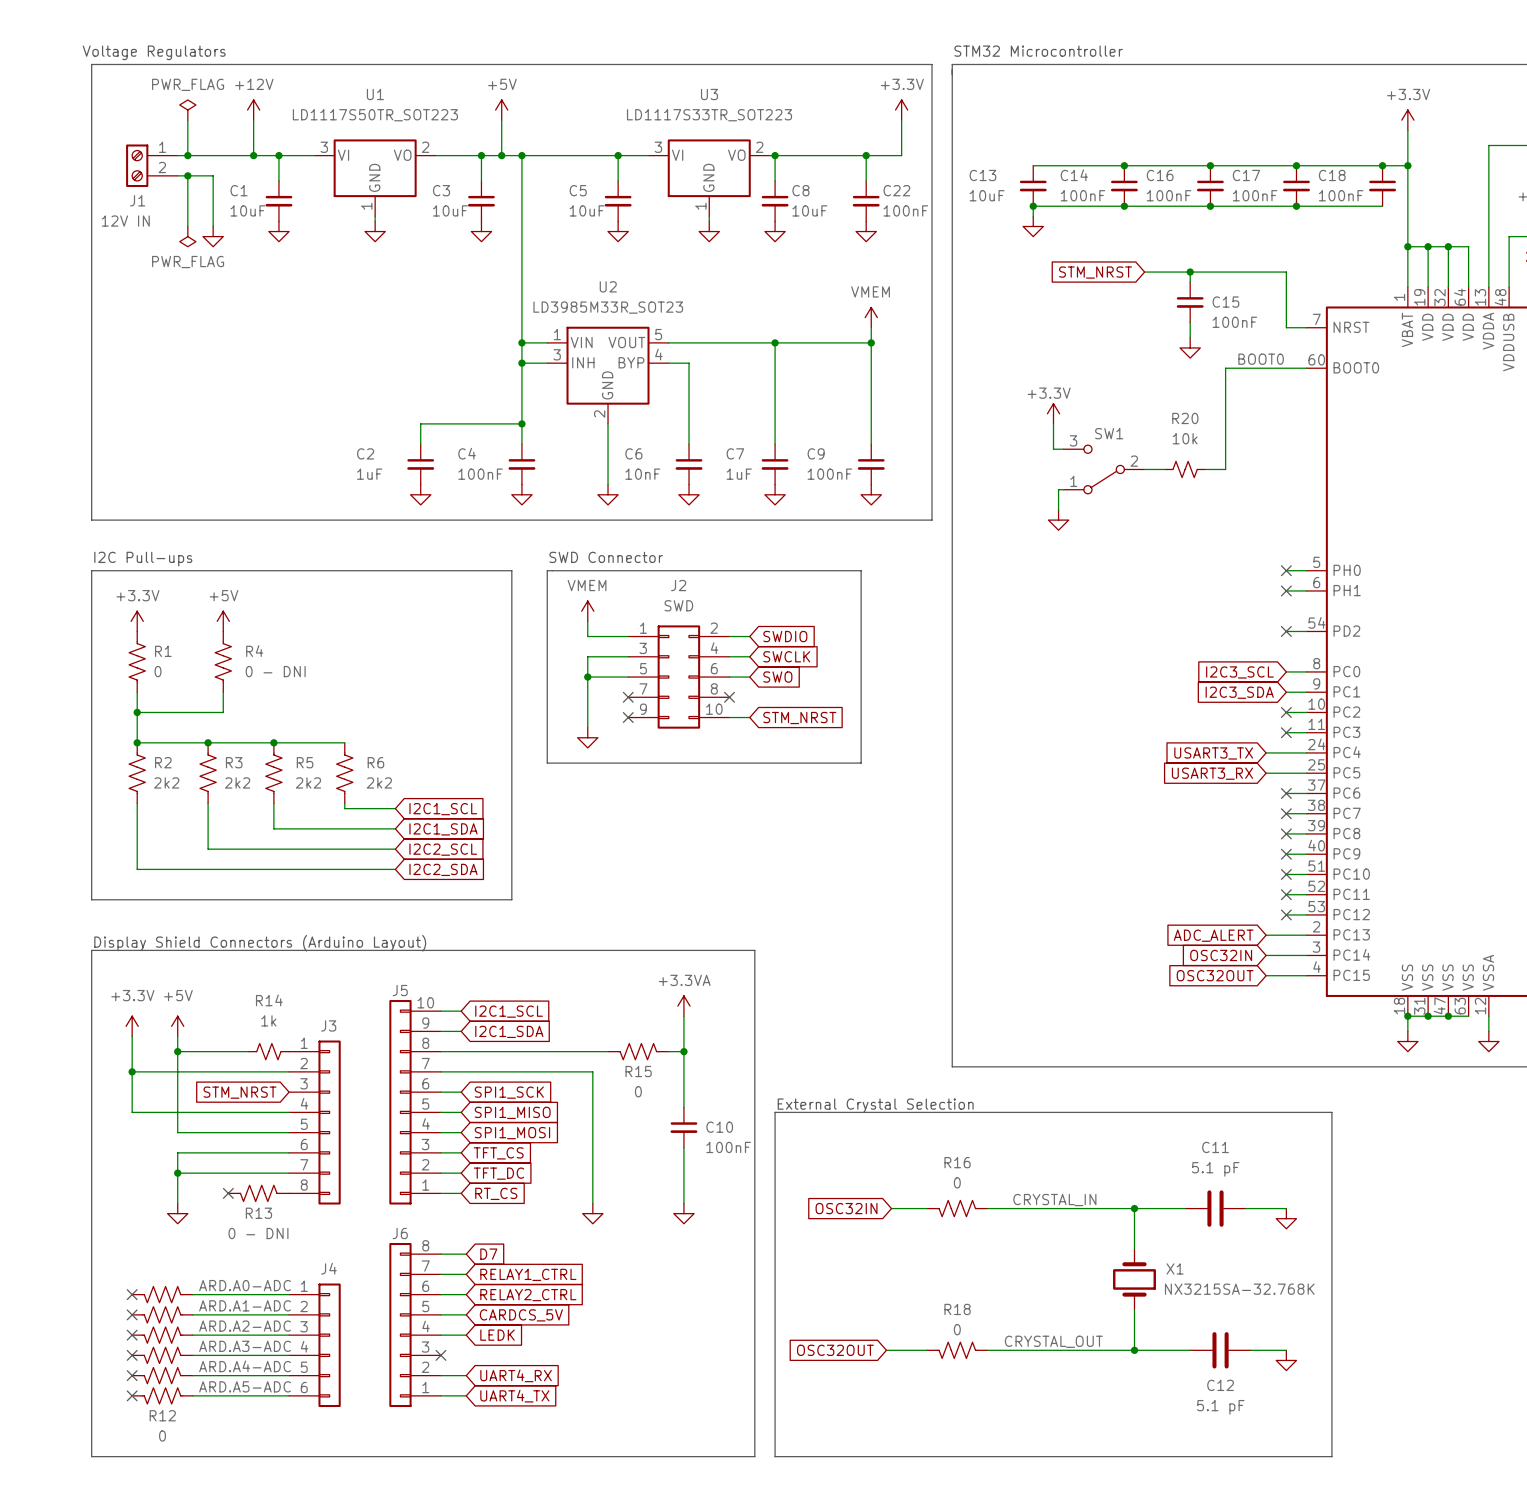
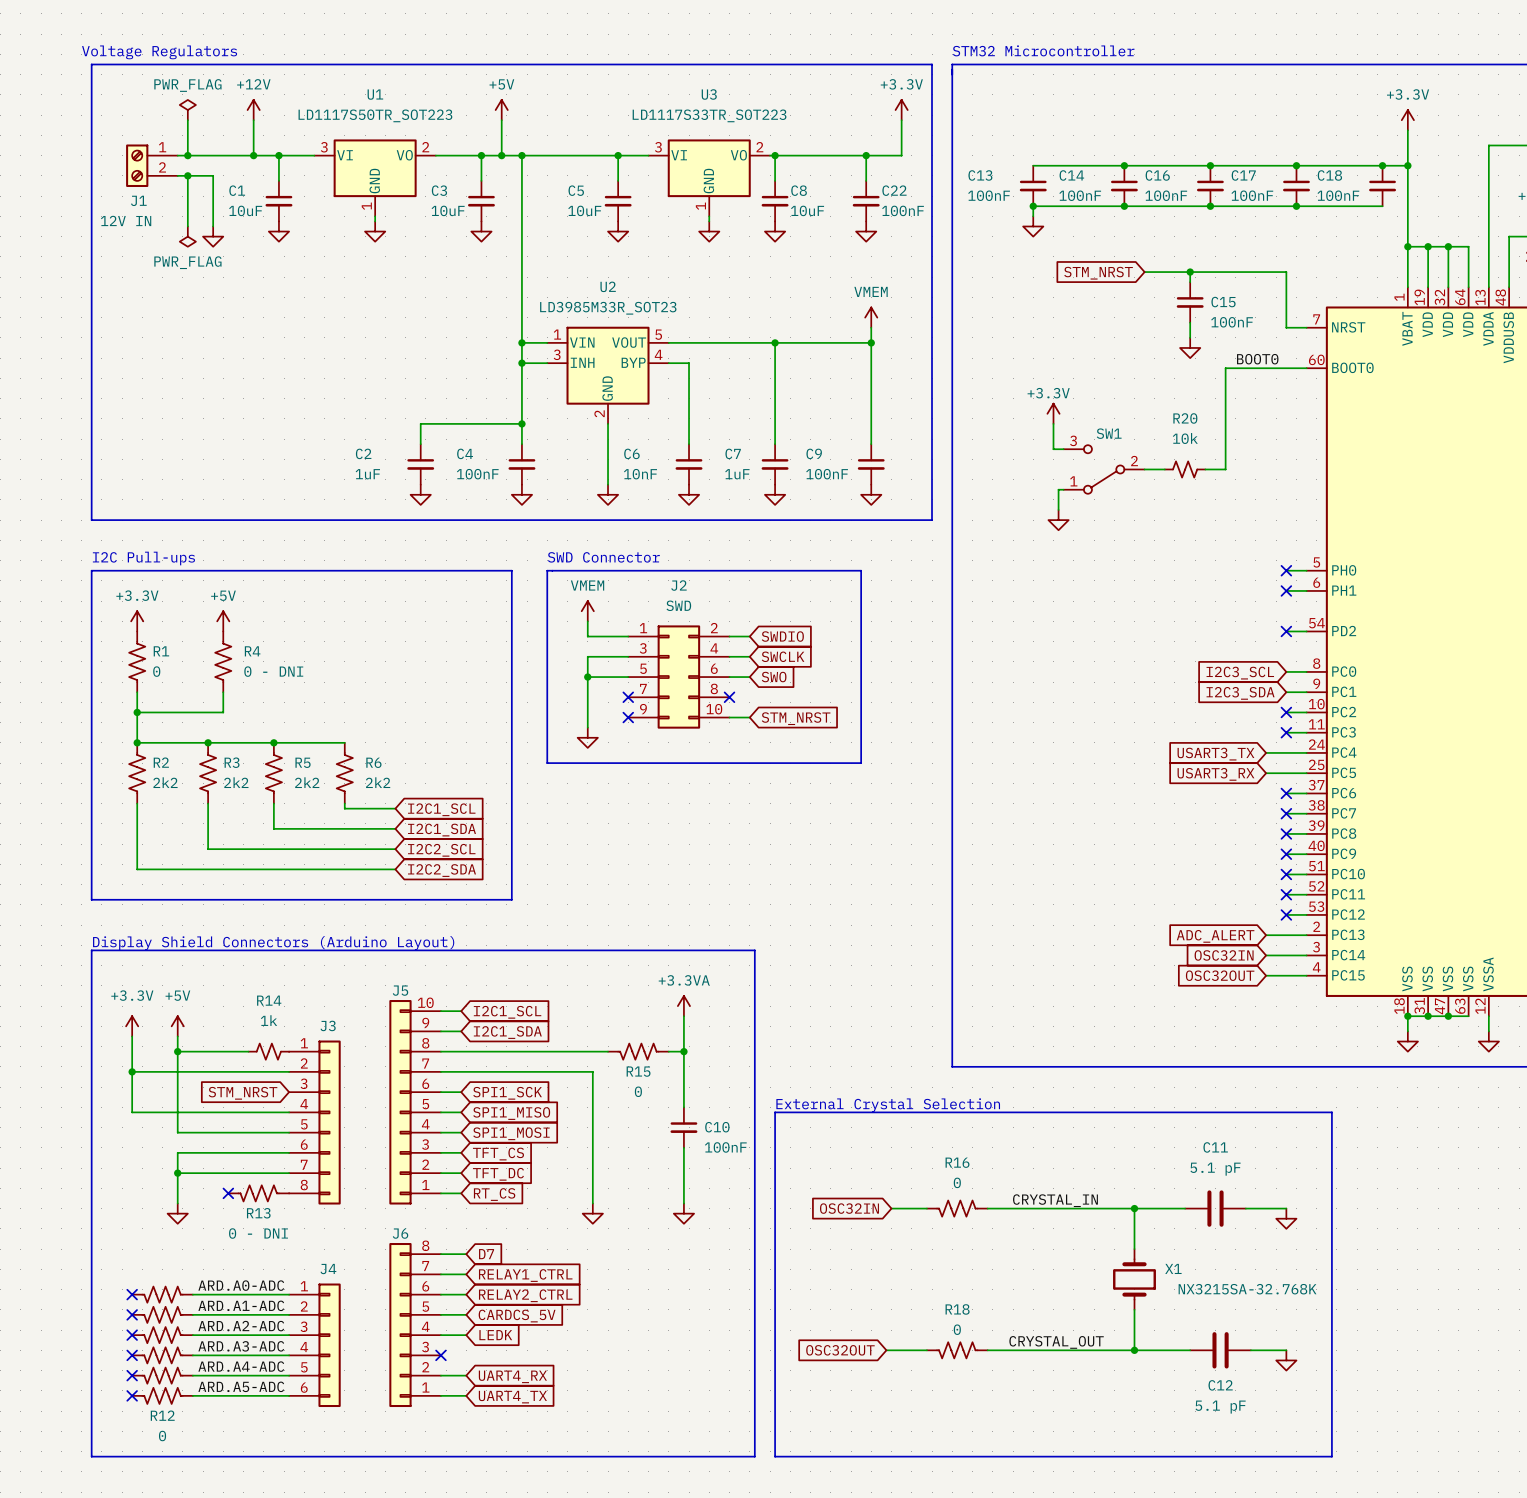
C13 value: 10uF (987, 195) -> 100nF (989, 195)

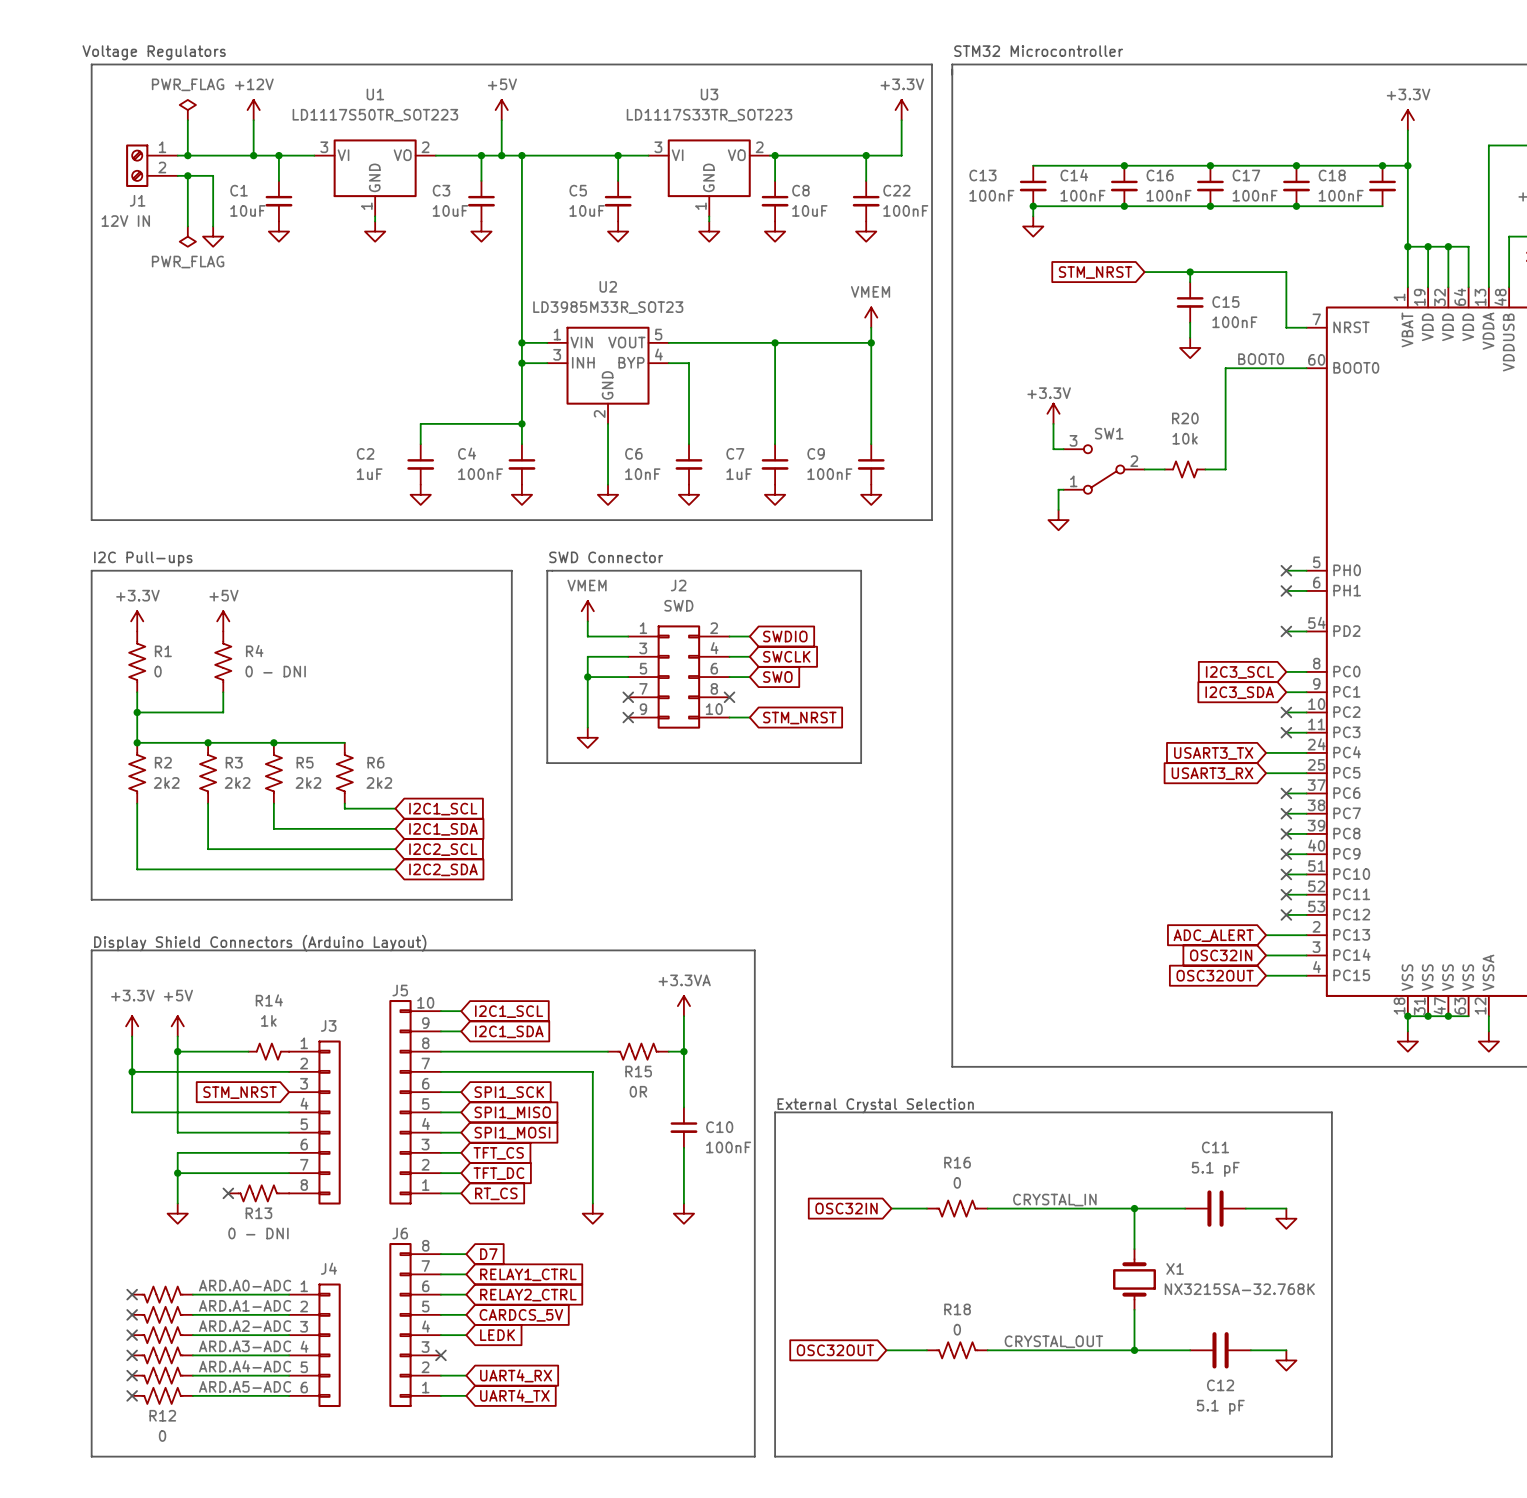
R15 value: 0 (638, 1091) -> 0R (638, 1091)

